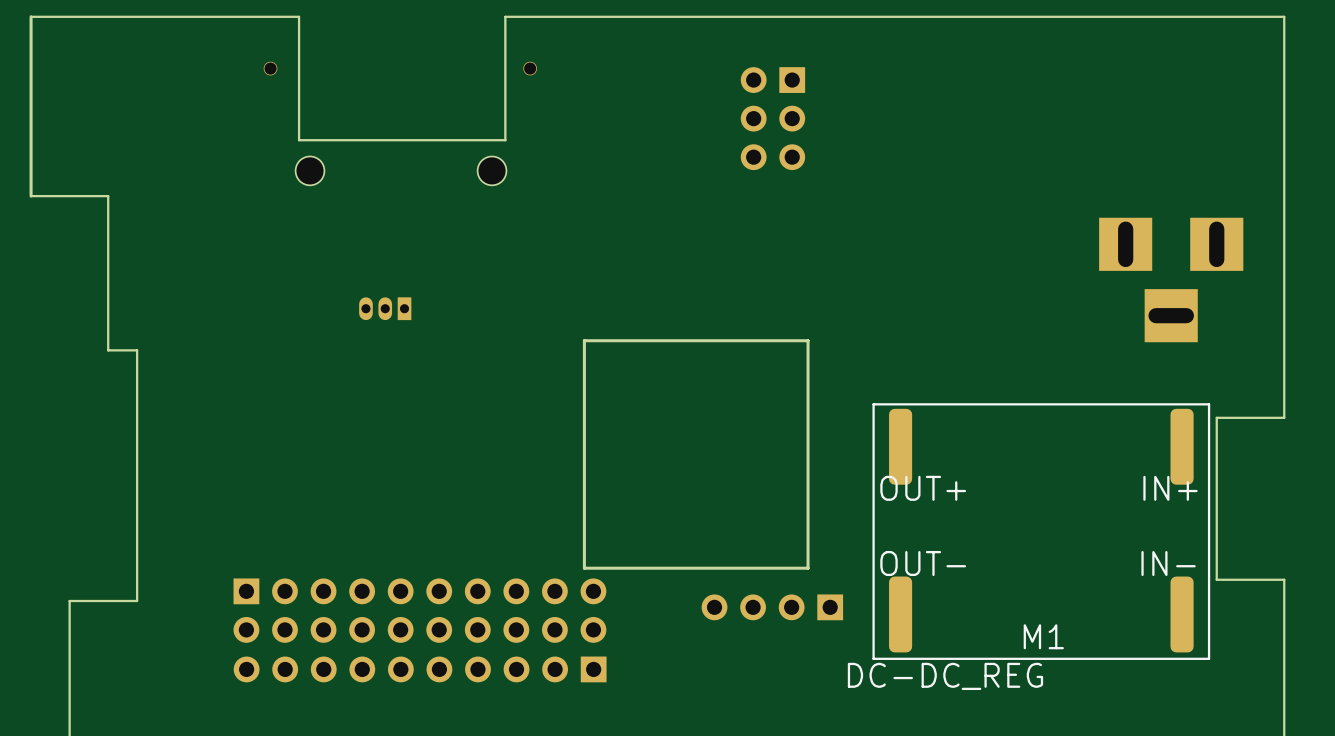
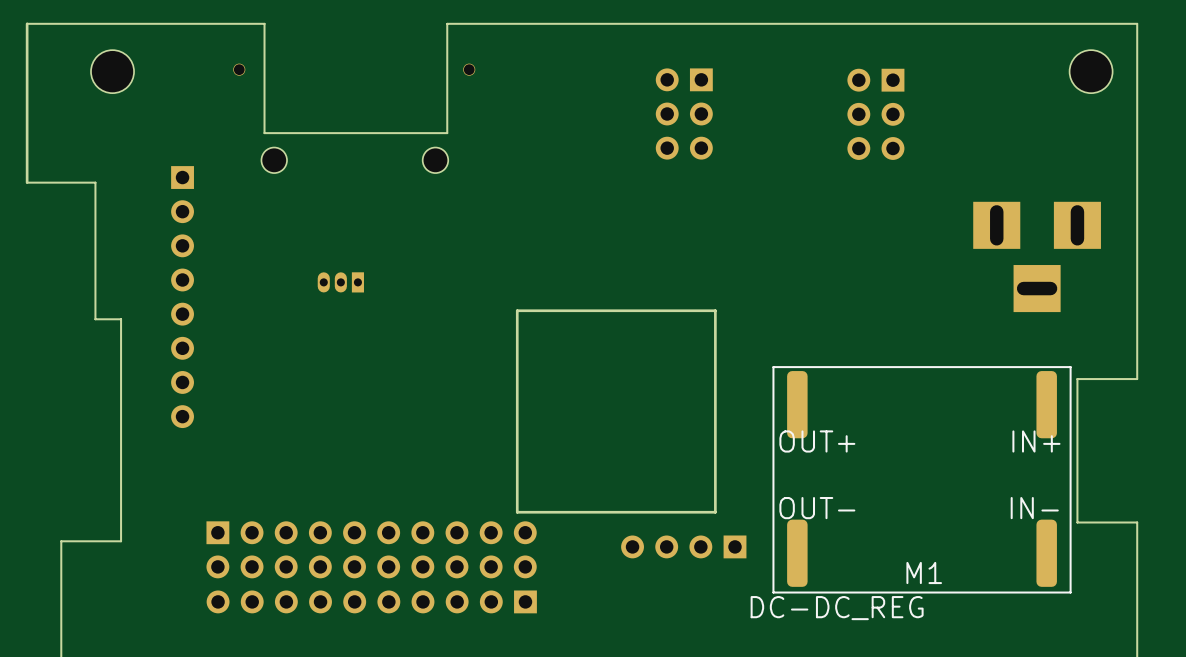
part: none -> (112, 71)
part: none -> (1091, 71)
part: none -> (875, 114)
part: none -> (182, 297)

